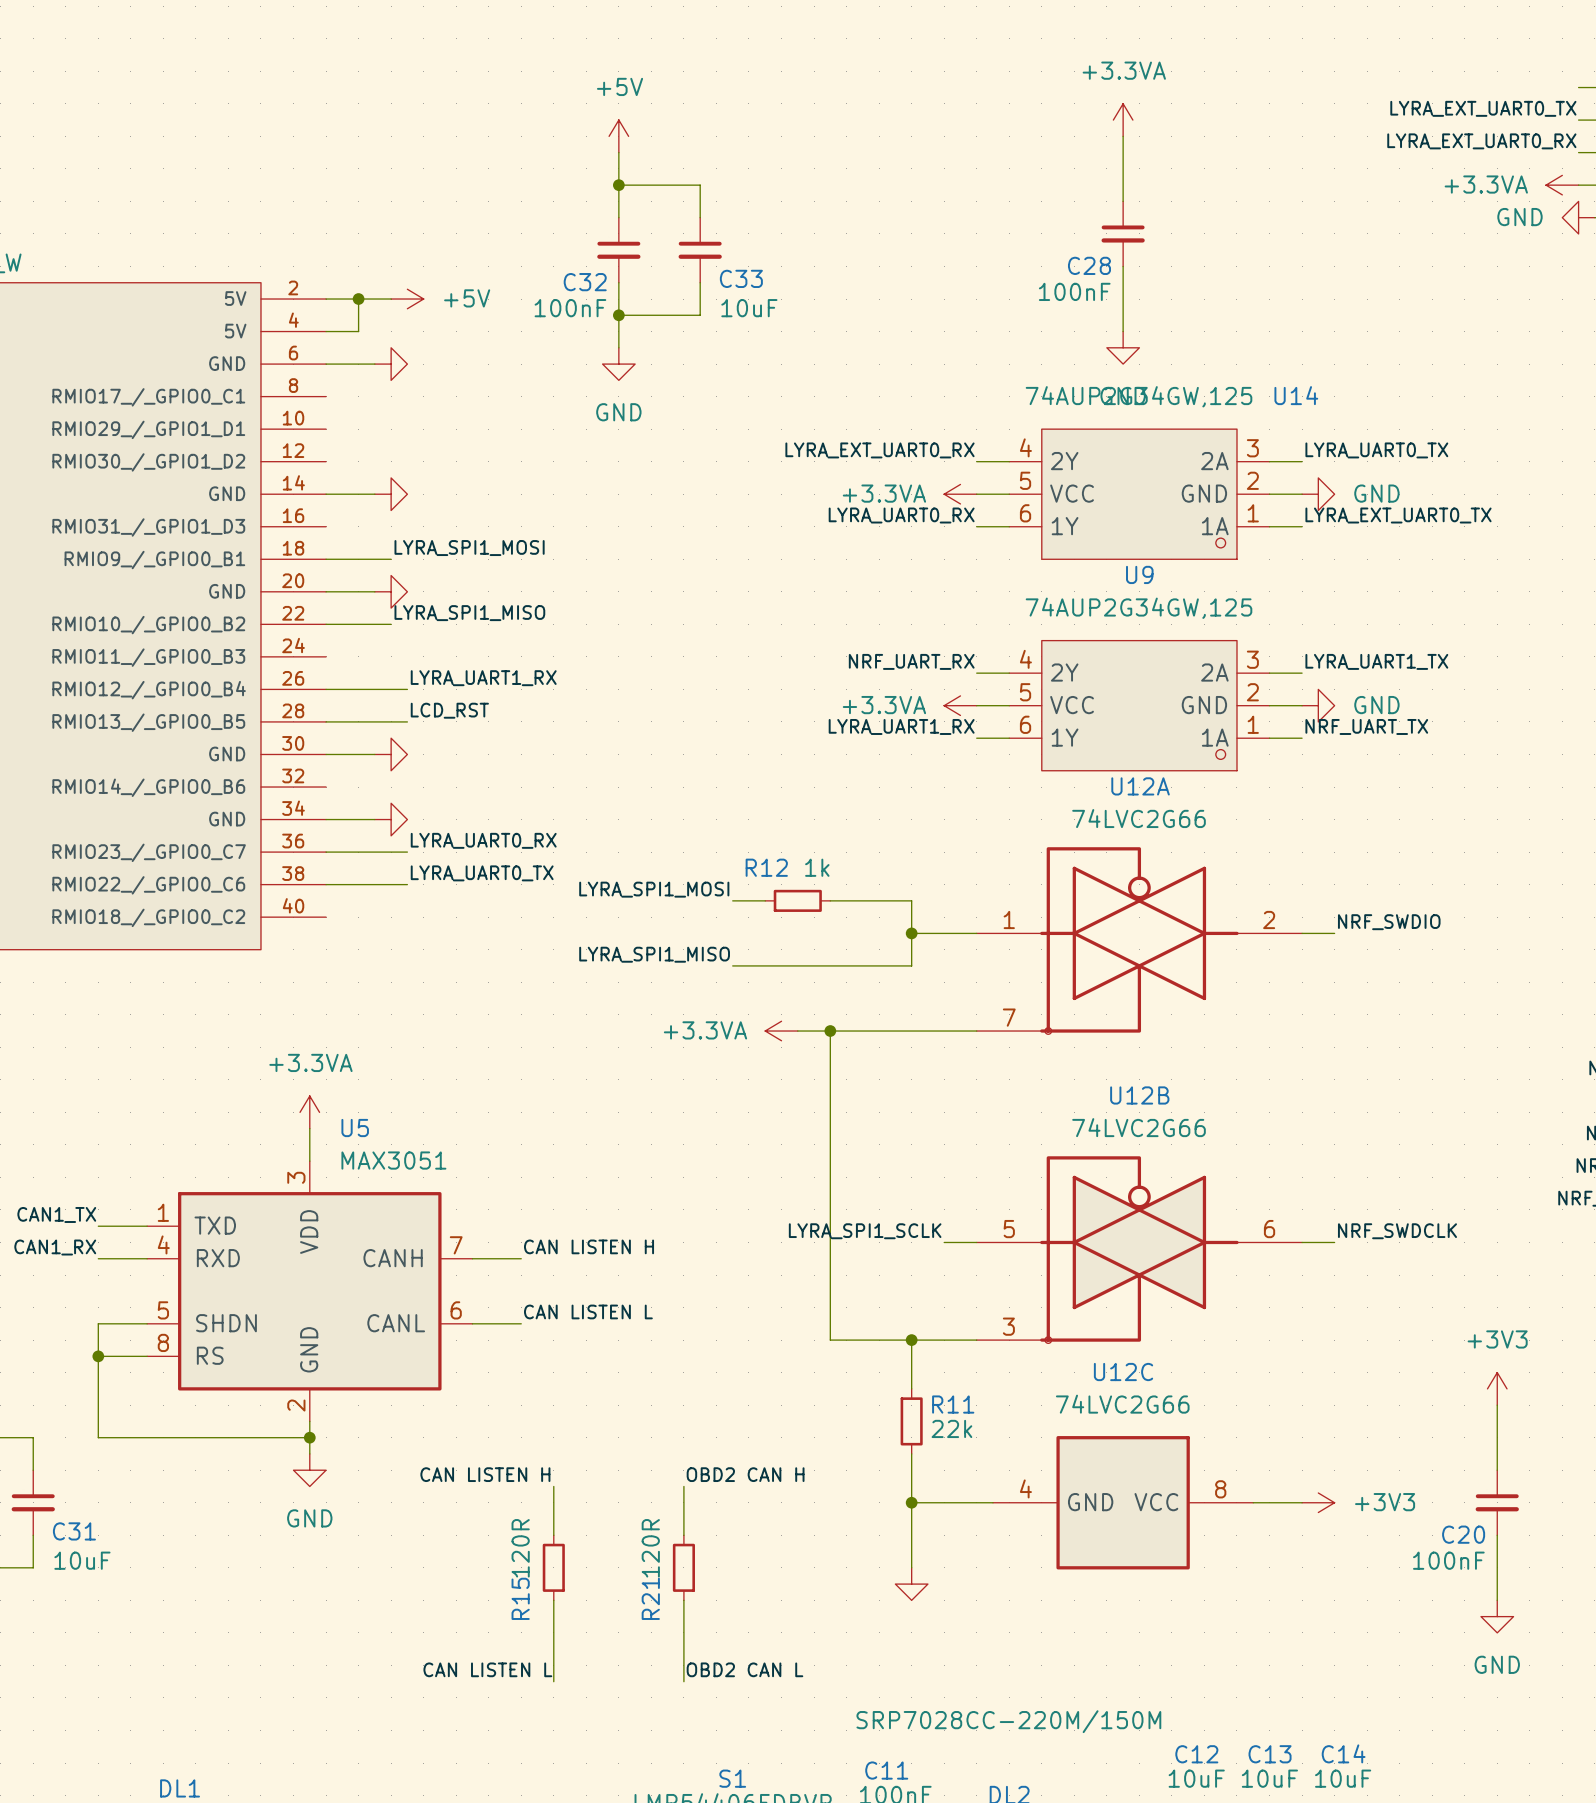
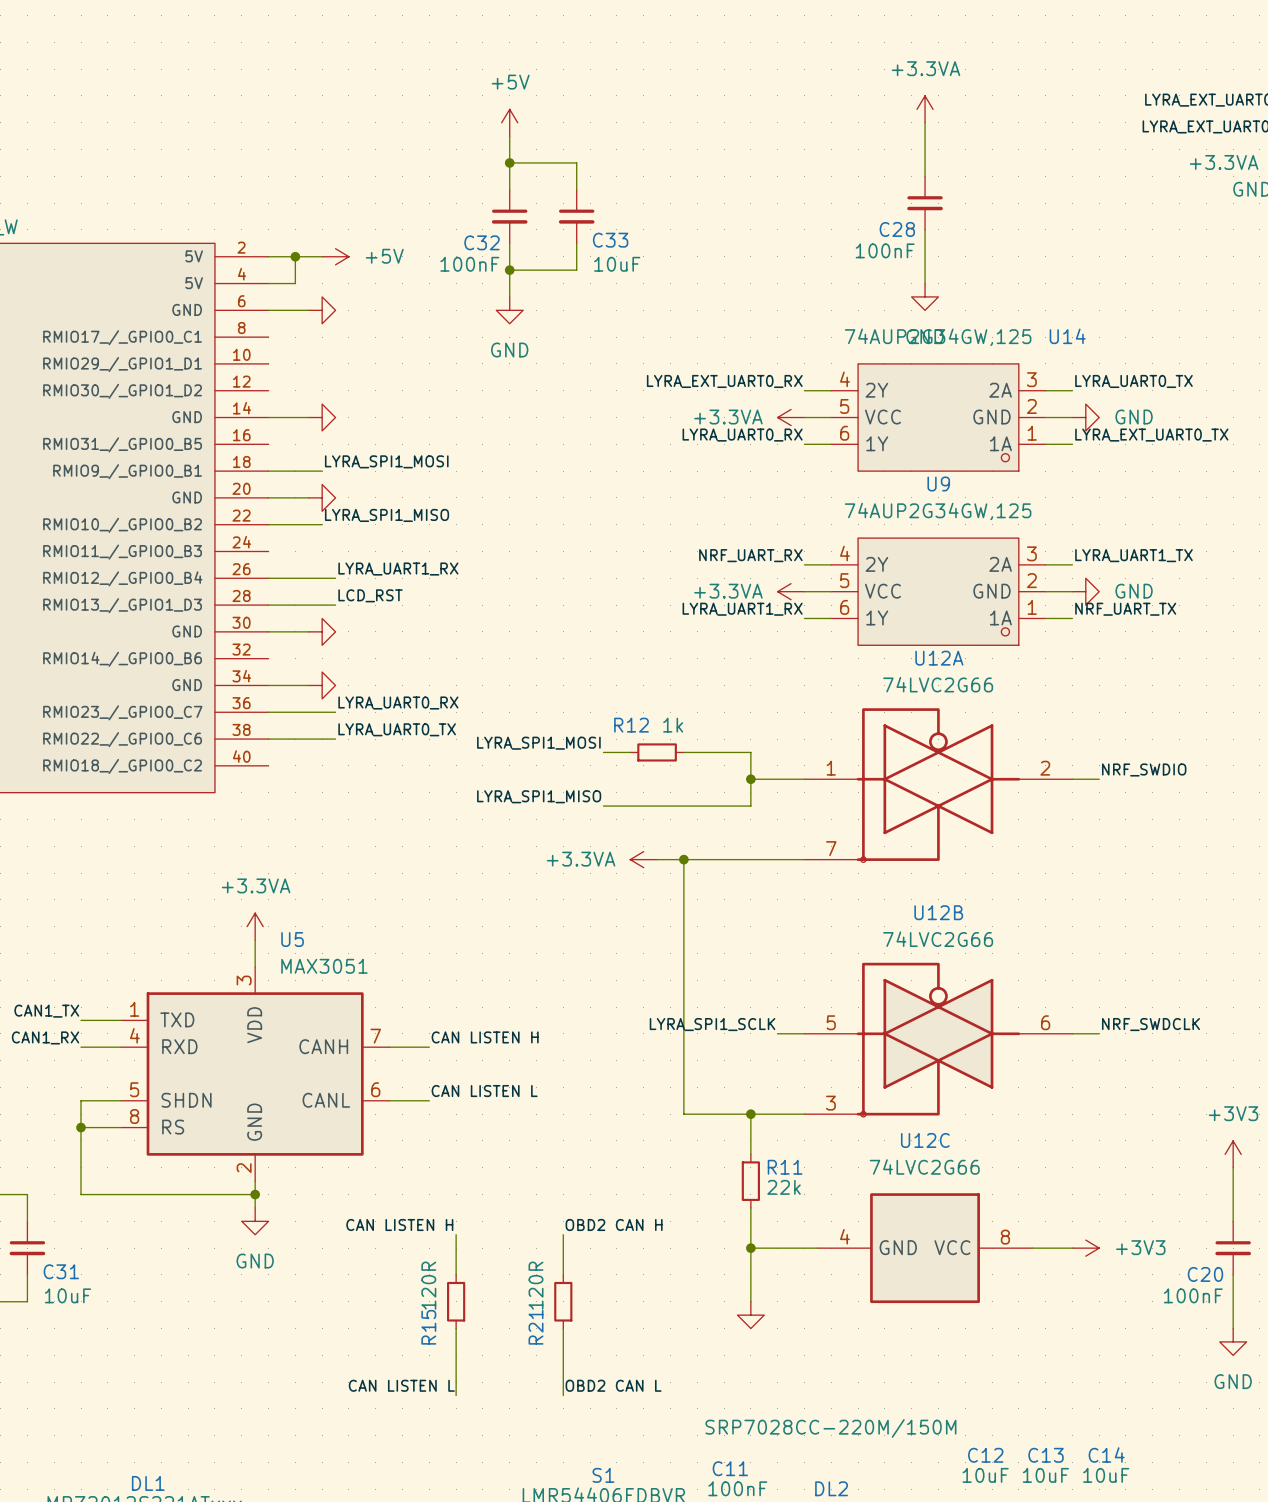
part pin name: RMIO31_/_GPIO1_D3 (148, 527) -> RMIO31_/_GPIO0_B5 (122, 444)
part pin name: RMIO13_/_GPIO0_B5 (148, 722) -> RMIO13_/_GPIO1_D3 (122, 605)

